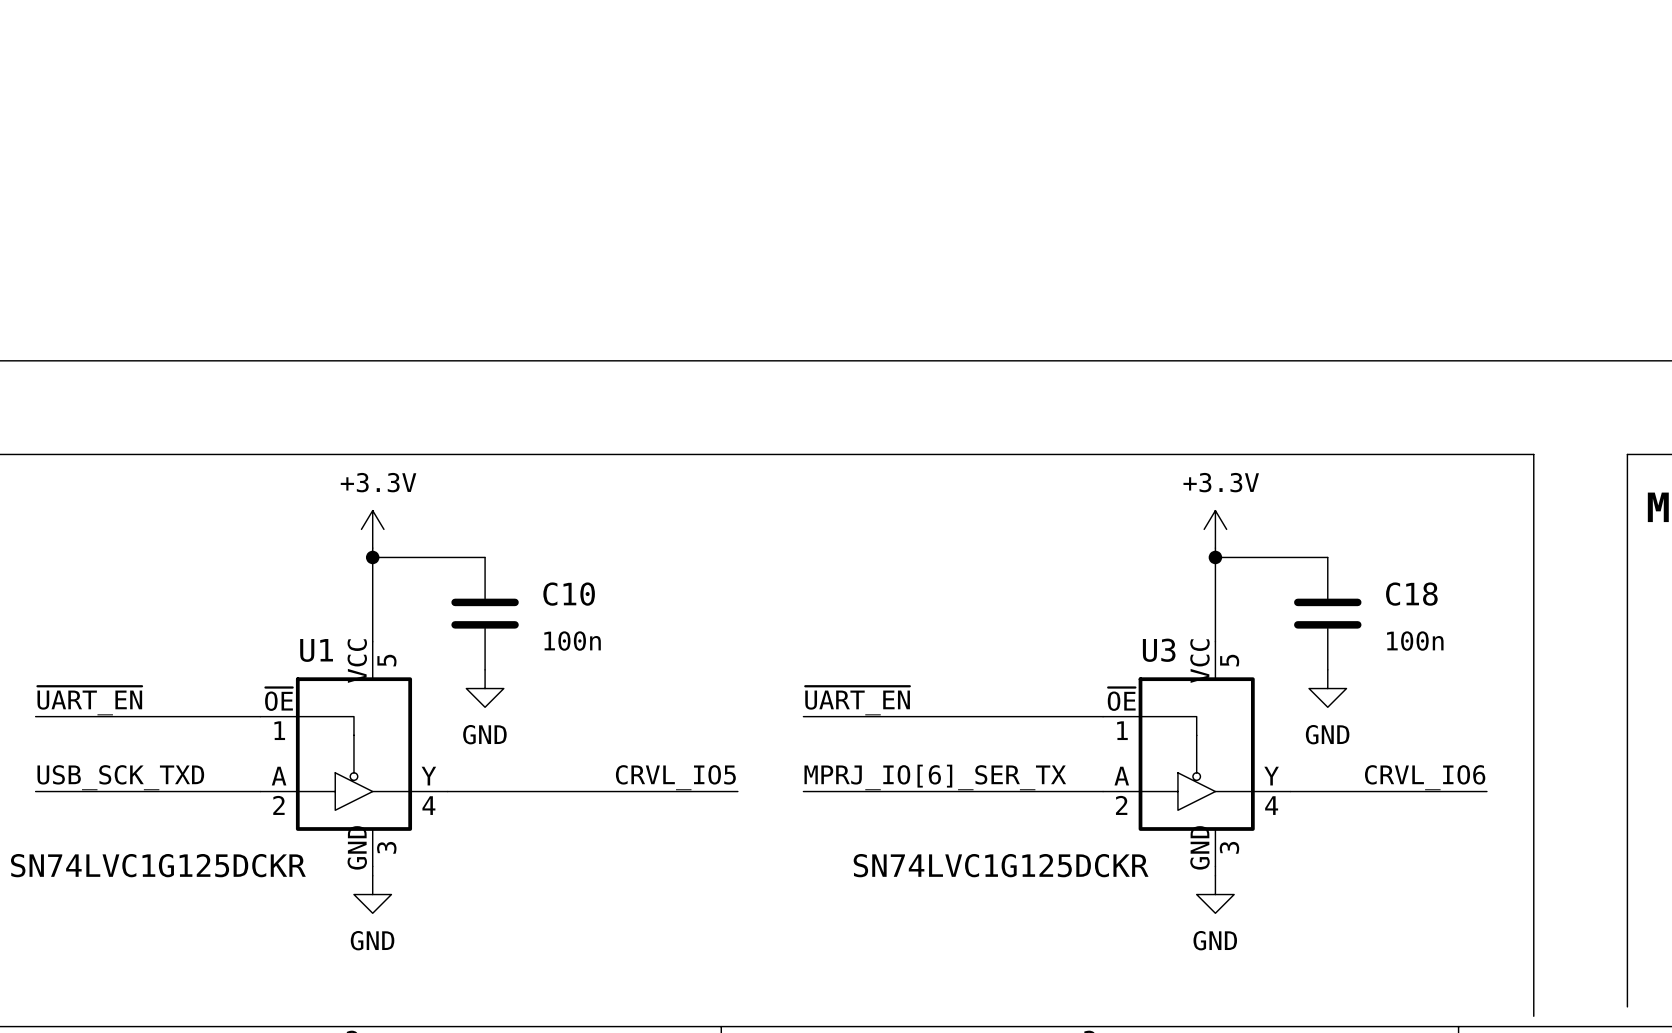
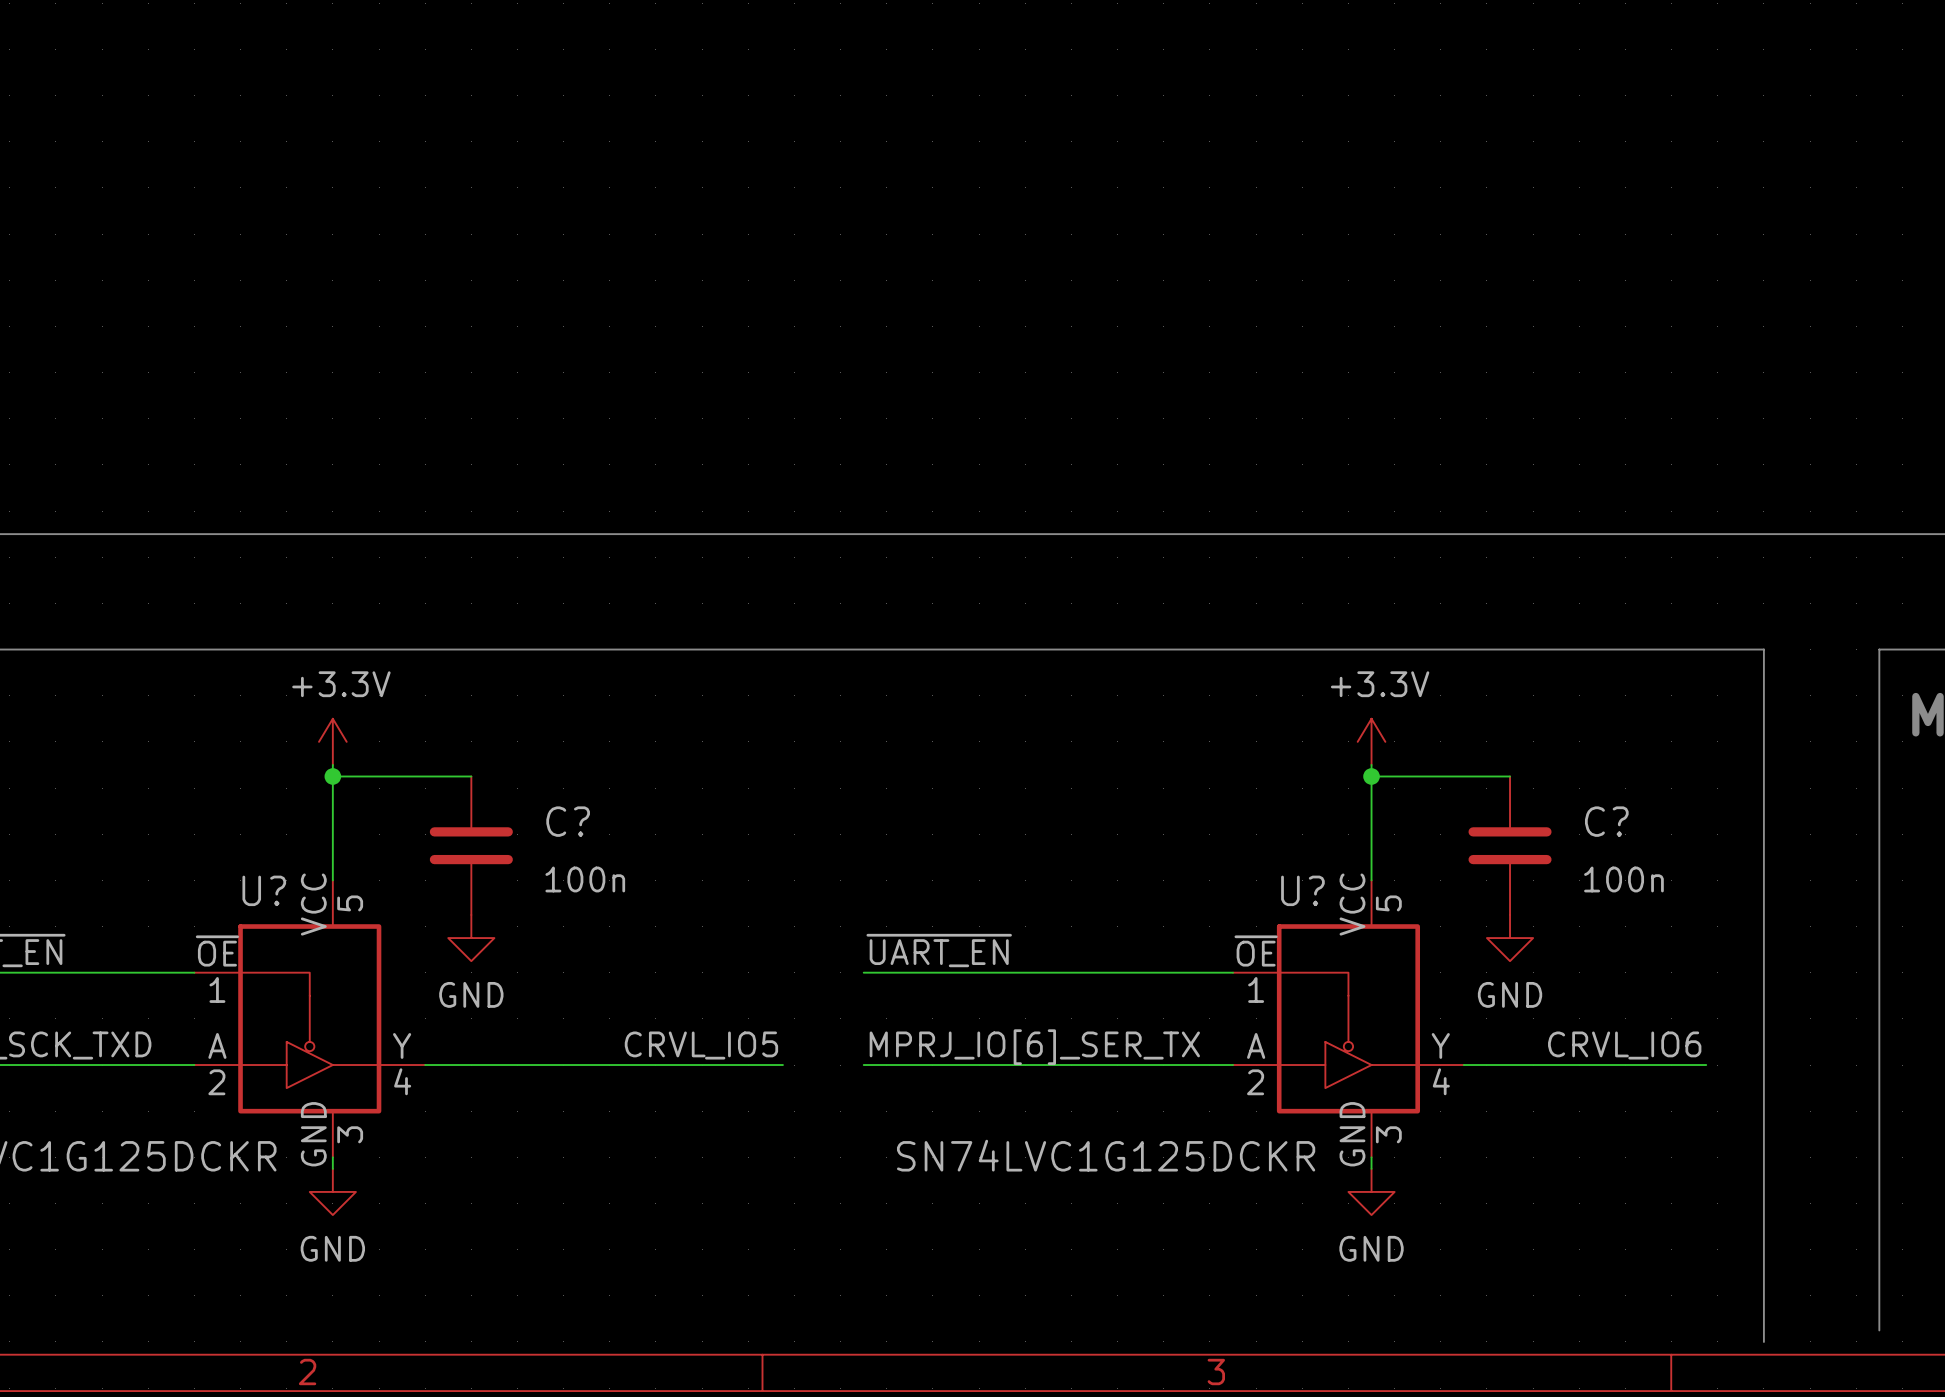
C10 name: C10 (569, 594) -> C? (568, 821)
C18 name: C18 (1411, 594) -> C? (1606, 821)
U1 name: U1 (316, 650) -> U? (264, 890)
U3 name: U3 (1159, 650) -> U? (1302, 890)

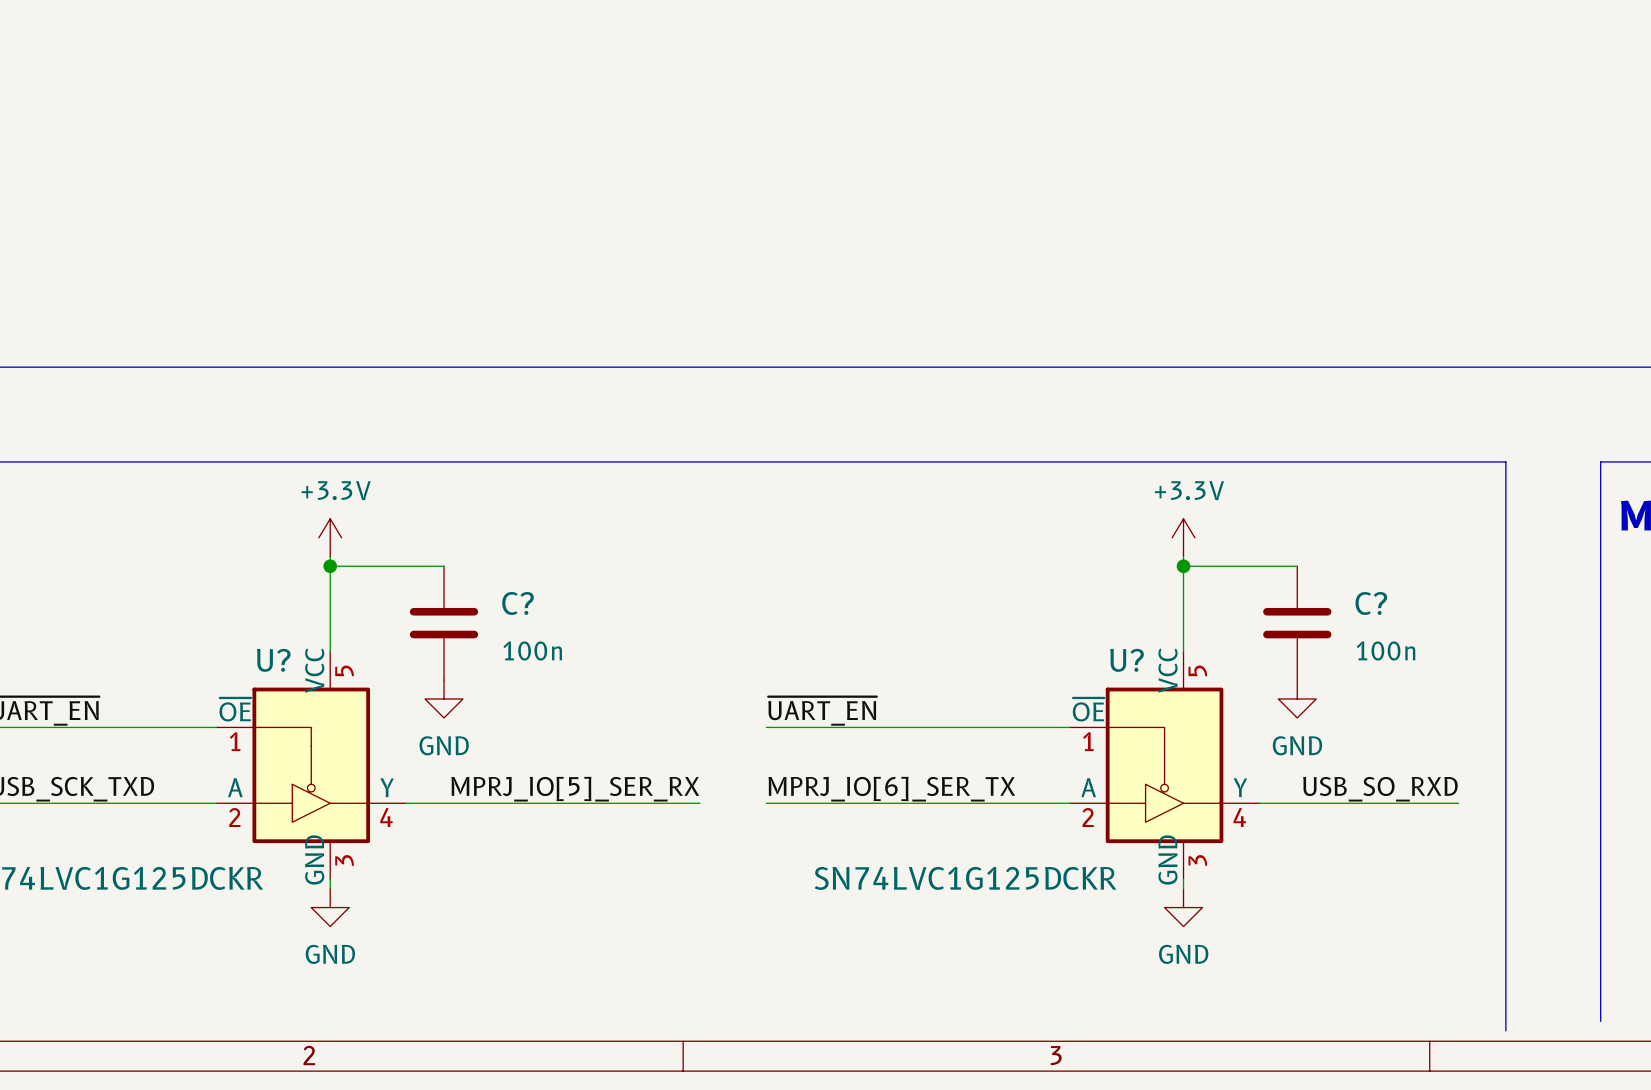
label: CRVL_IO5 (701, 1045) -> MPRJ_IO[5]_SER_RX (575, 789)
label: CRVL_IO6 (1624, 1045) -> USB_SO_RXD (1380, 789)

